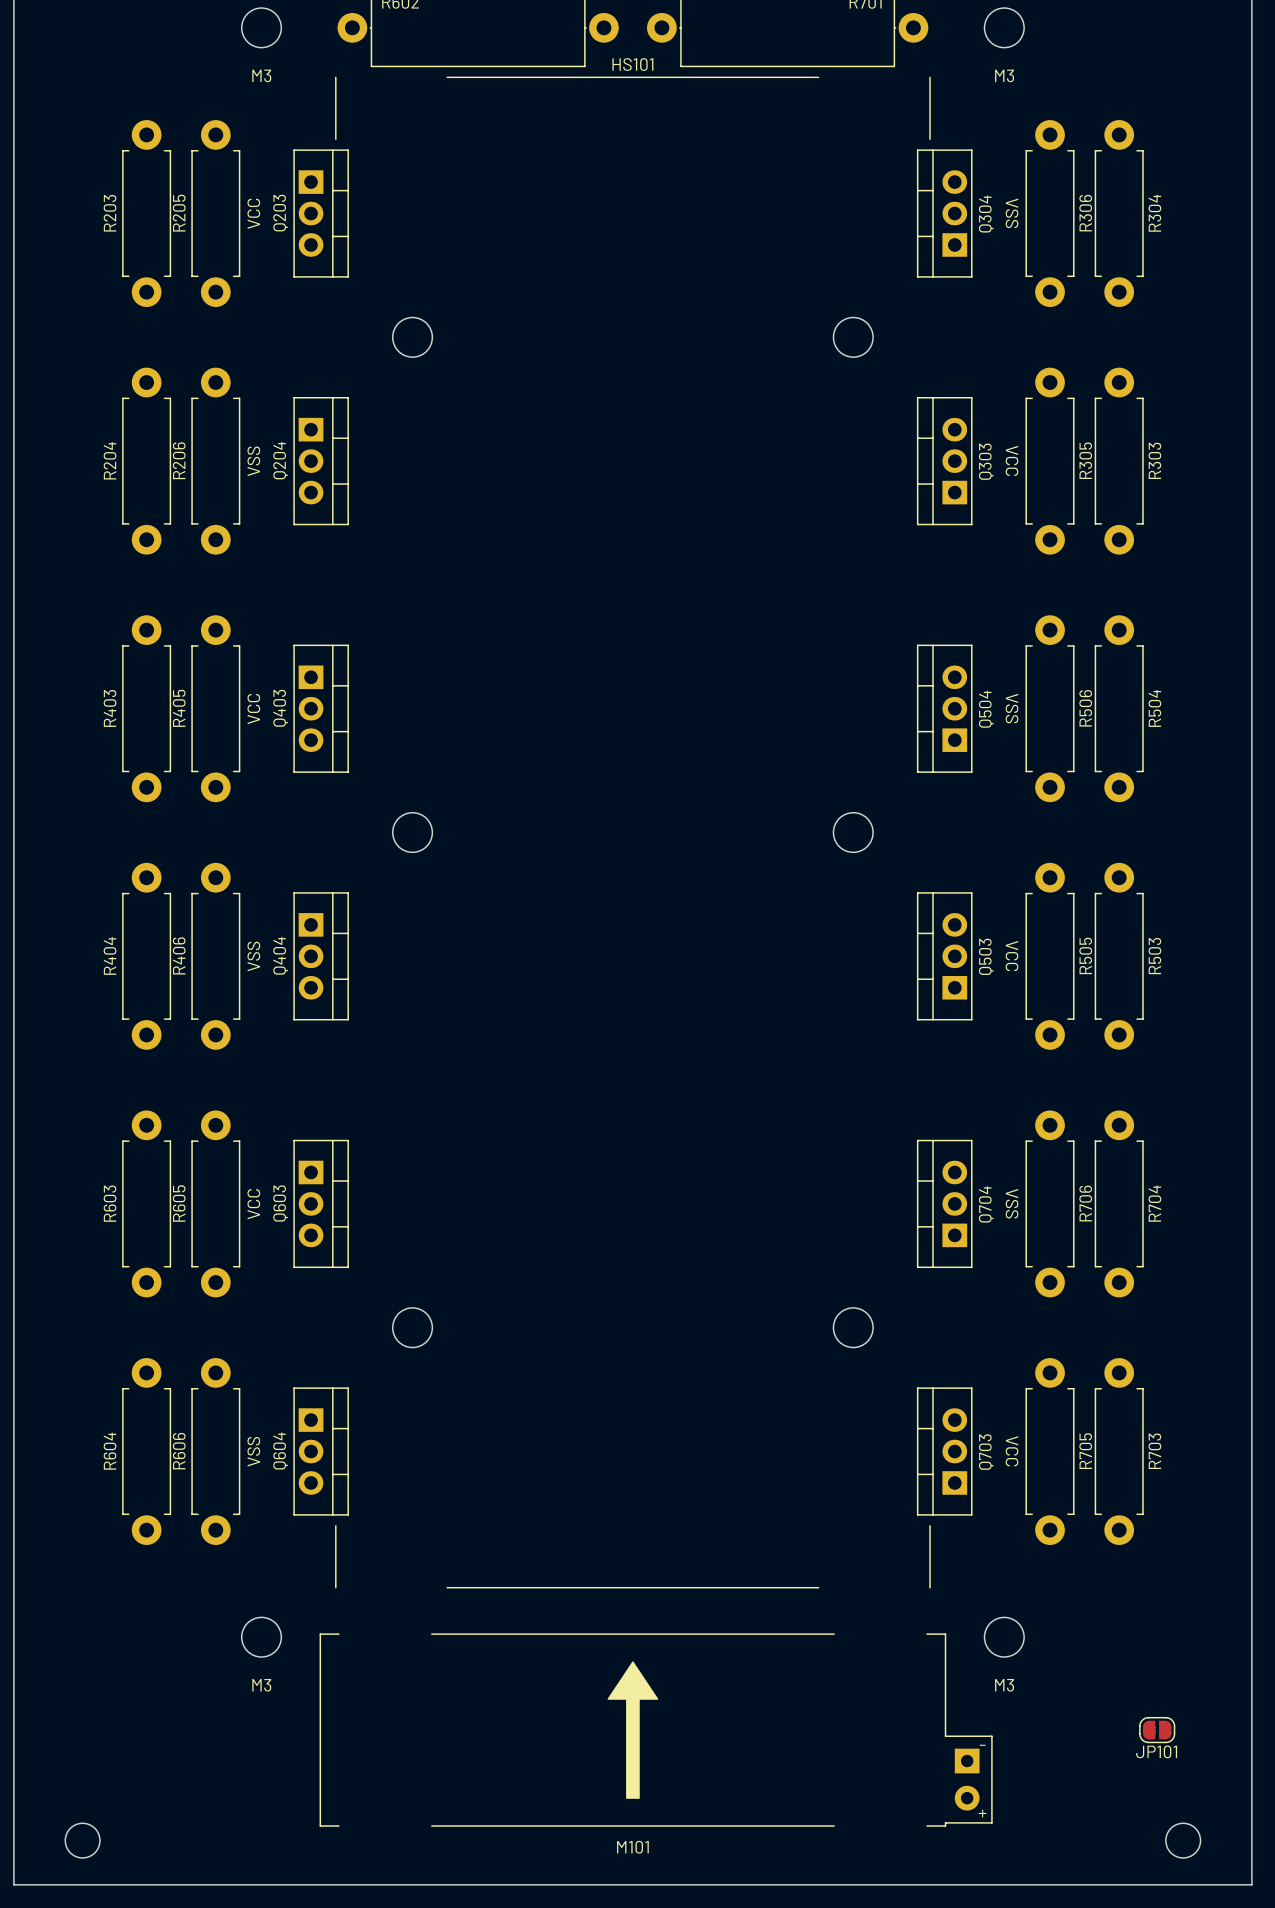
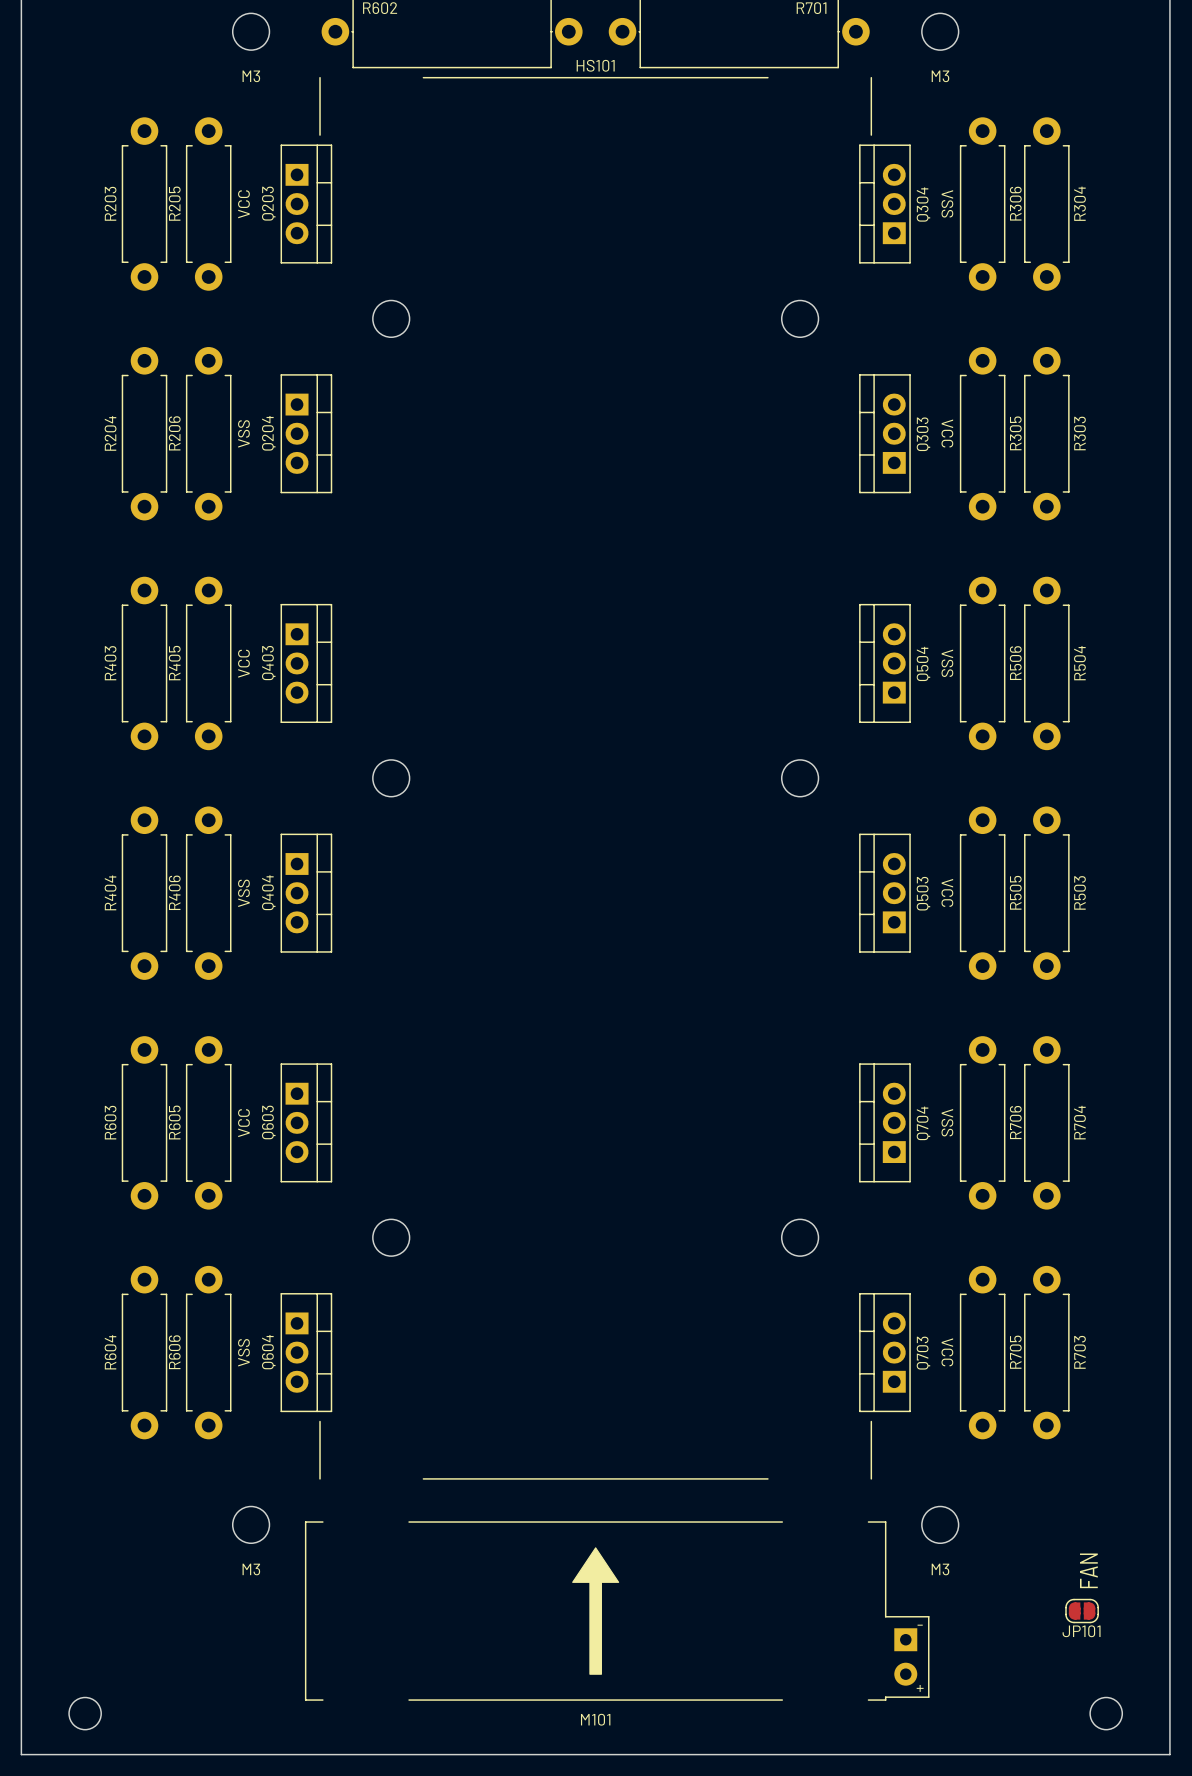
text: none -> FAN (1088, 1570)

